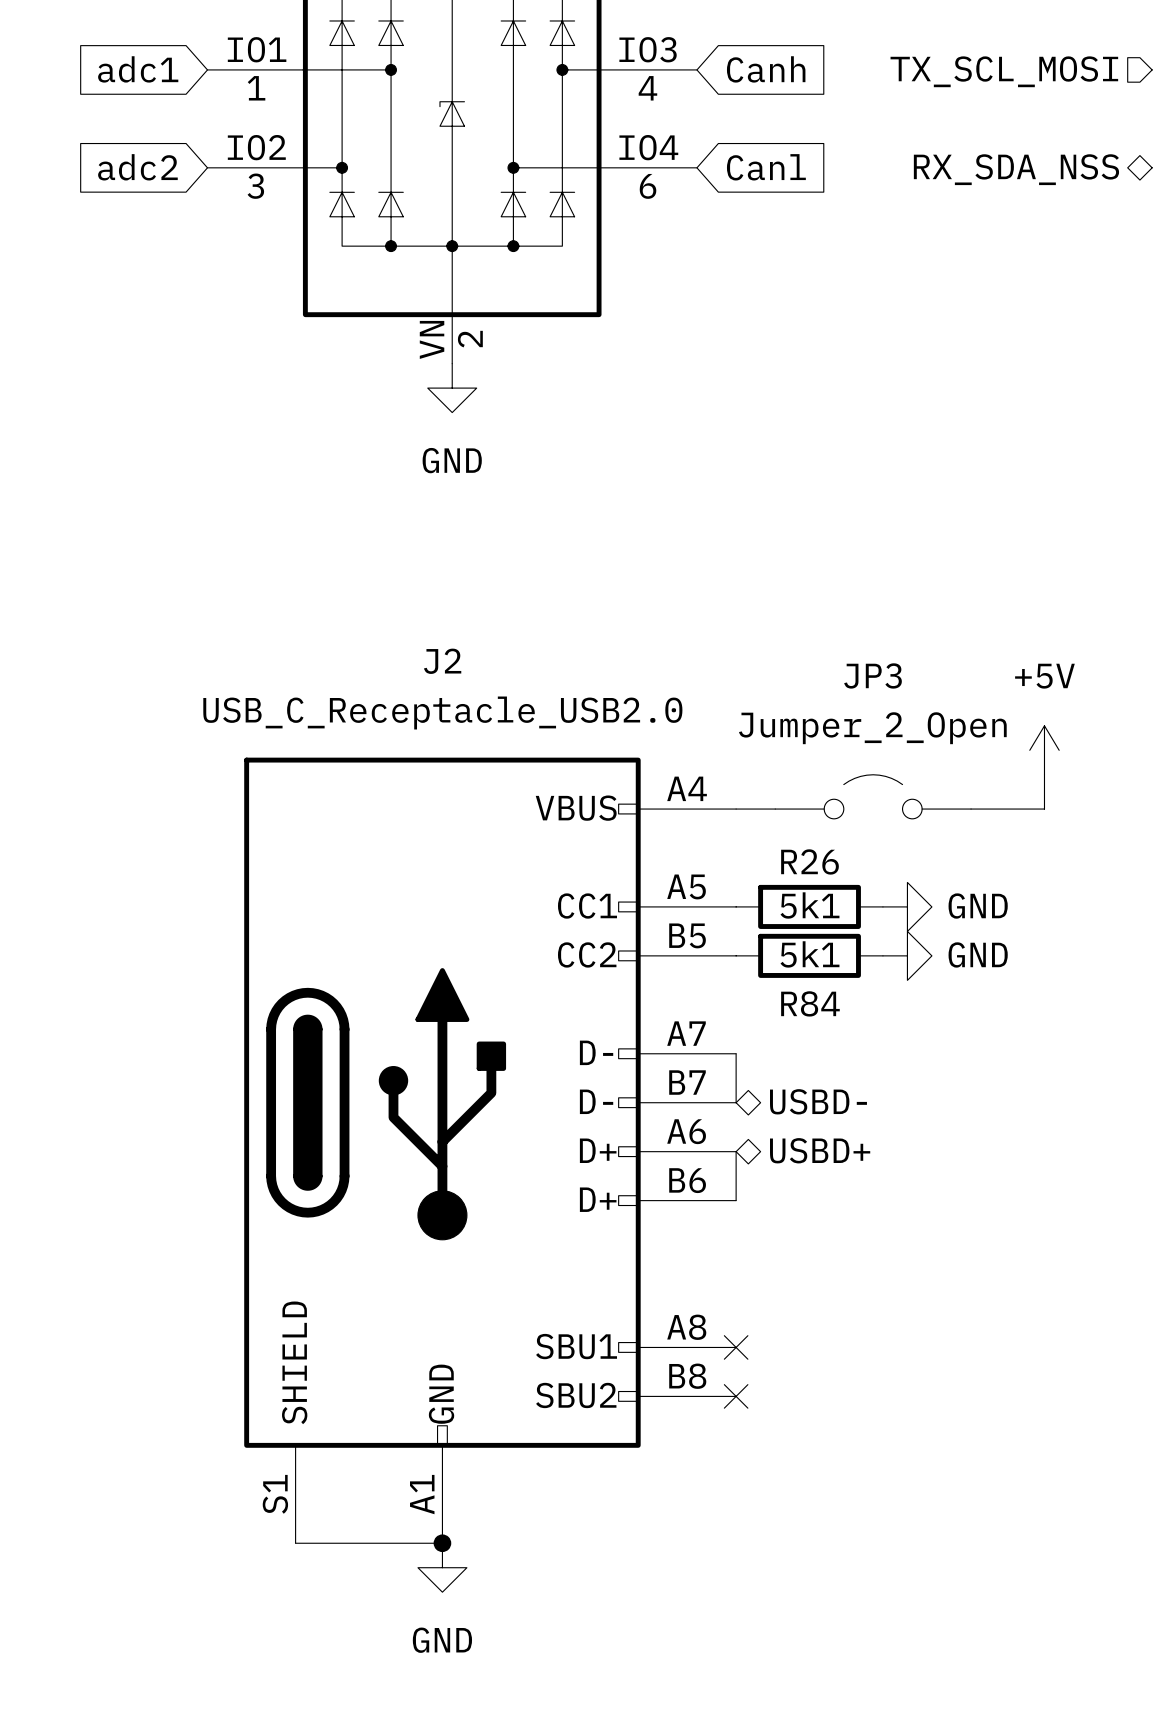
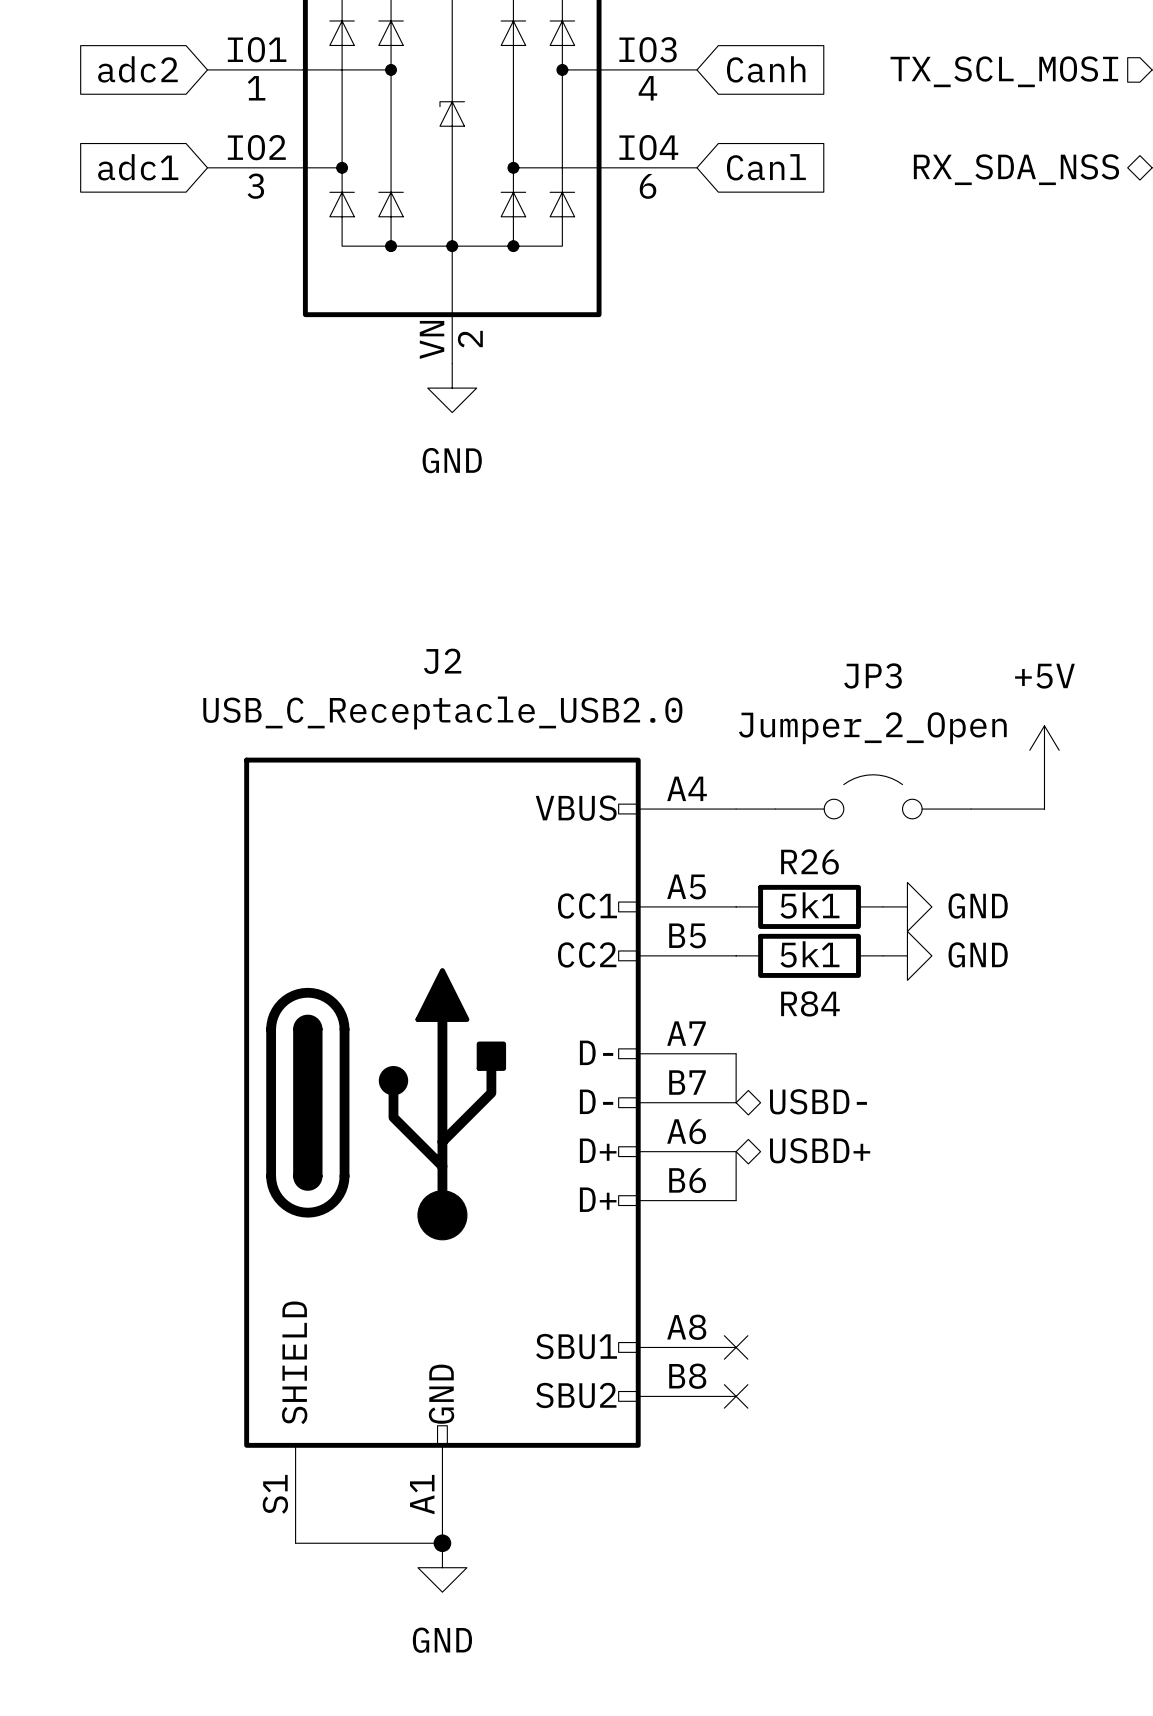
global label: adc1 (138, 69) -> adc2 (137, 69)
global label: adc2 (137, 167) -> adc1 (138, 167)

